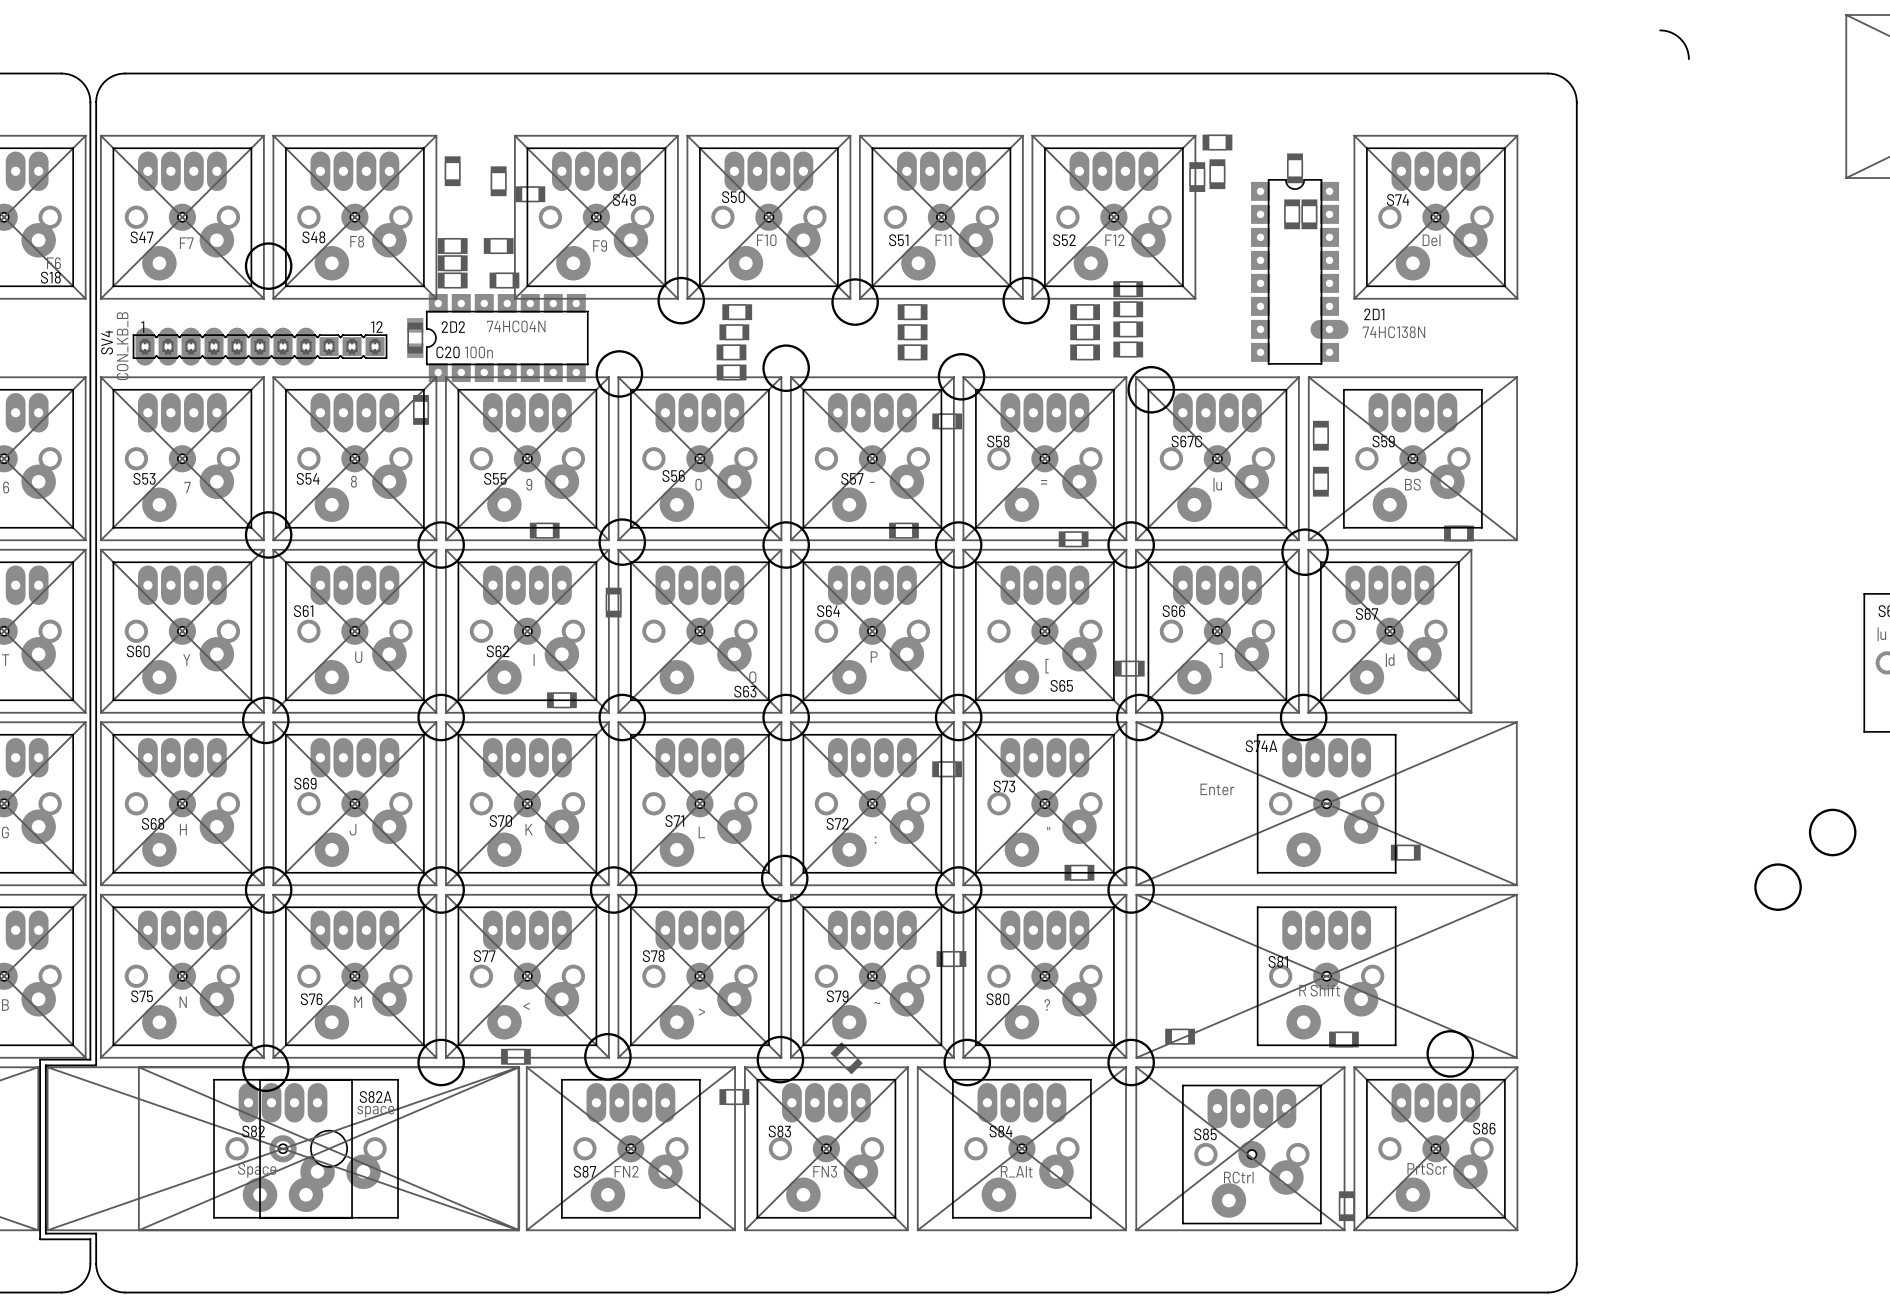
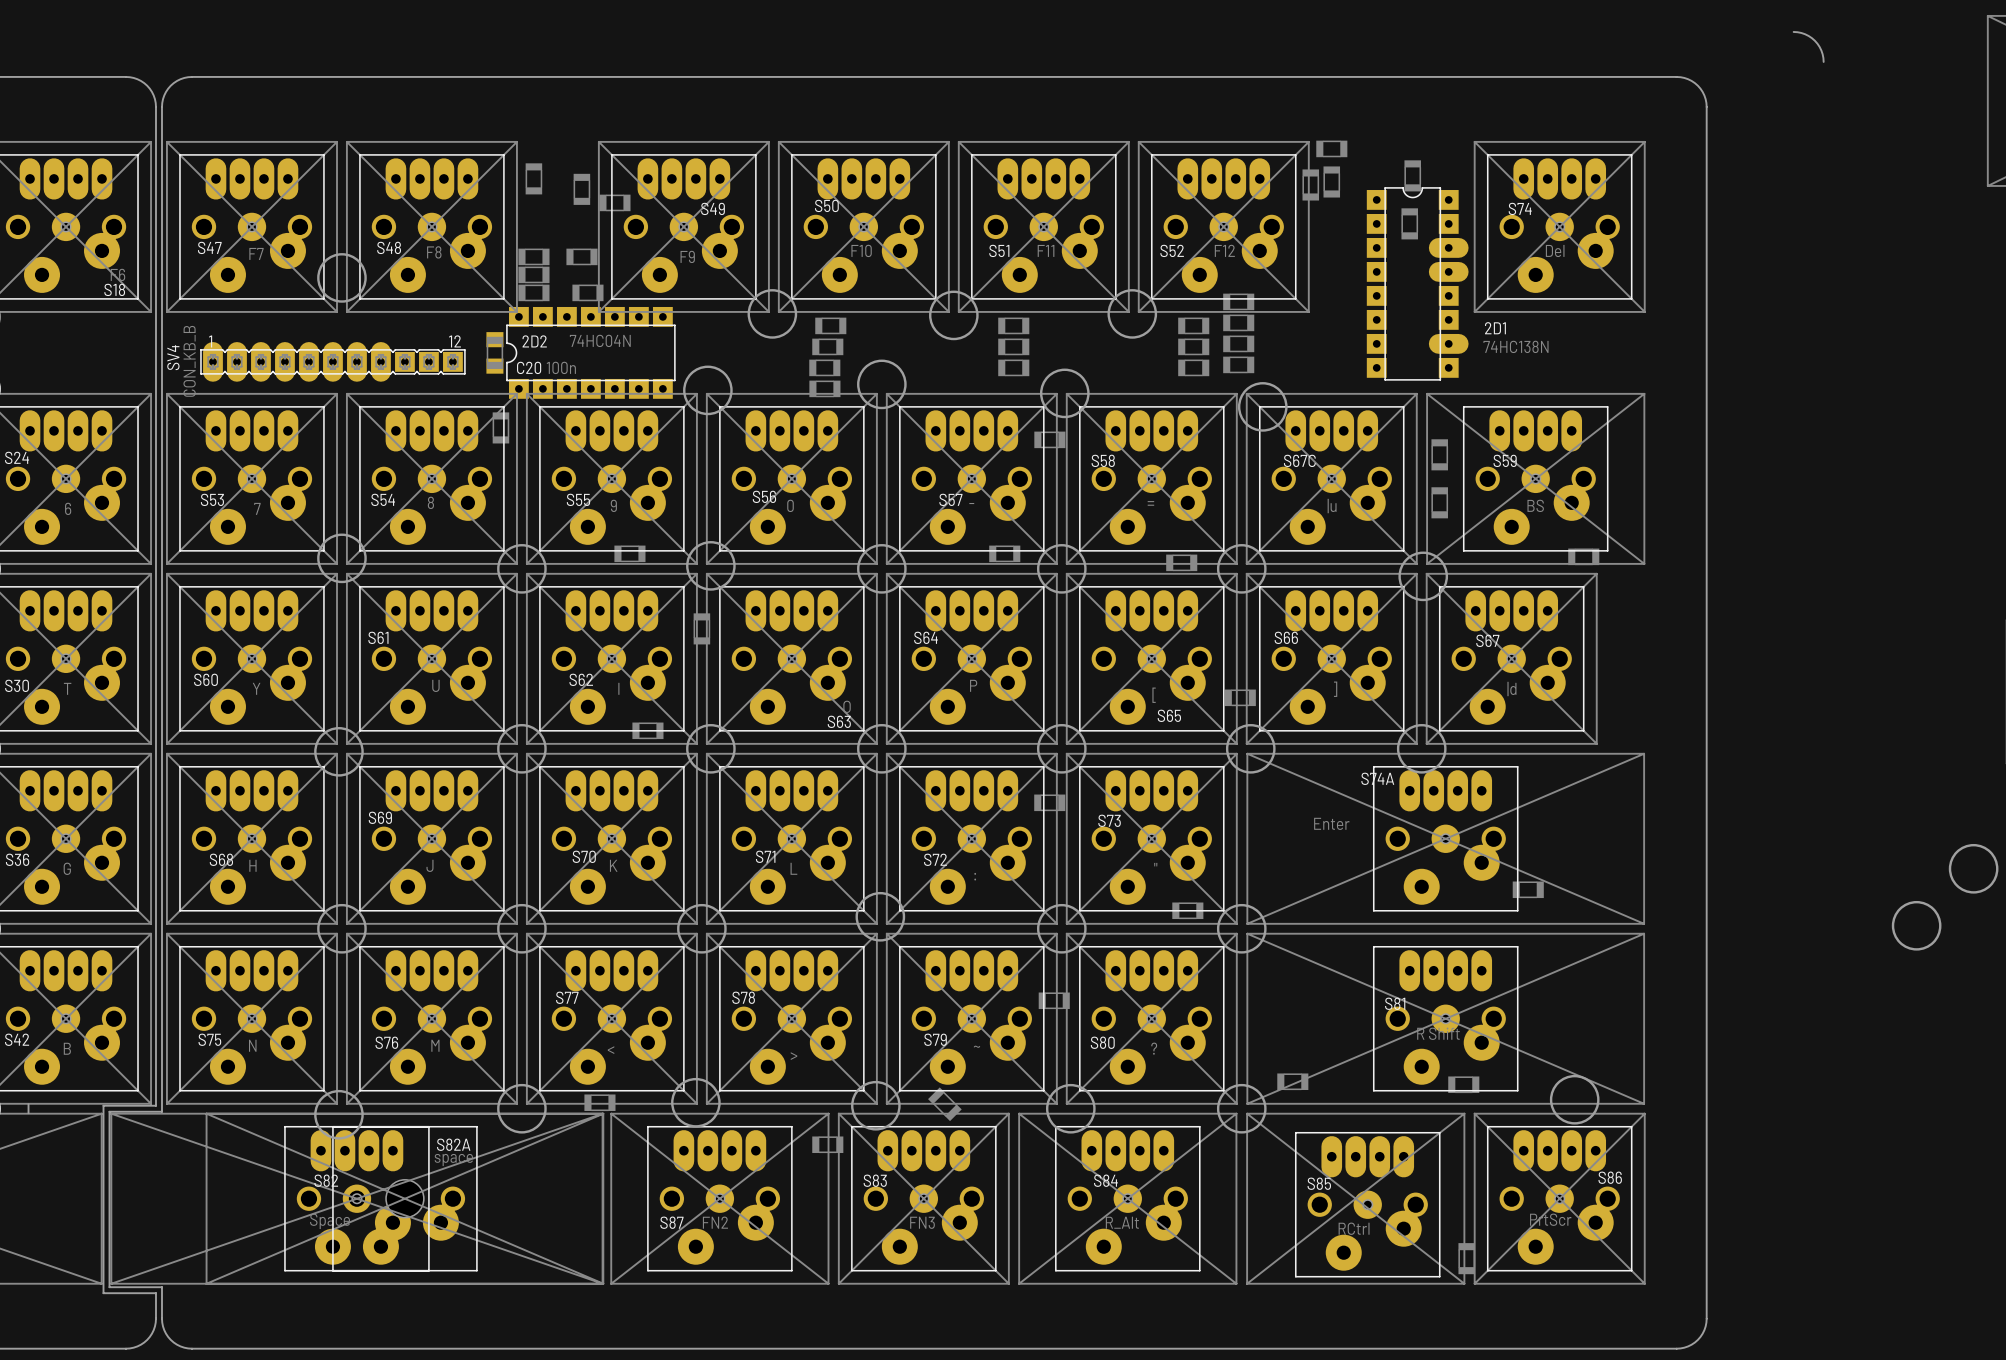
2D1 footprint: [1251, 179, 1349, 365] -> [1366, 187, 1469, 381]
part: (1309, 214) -> none

